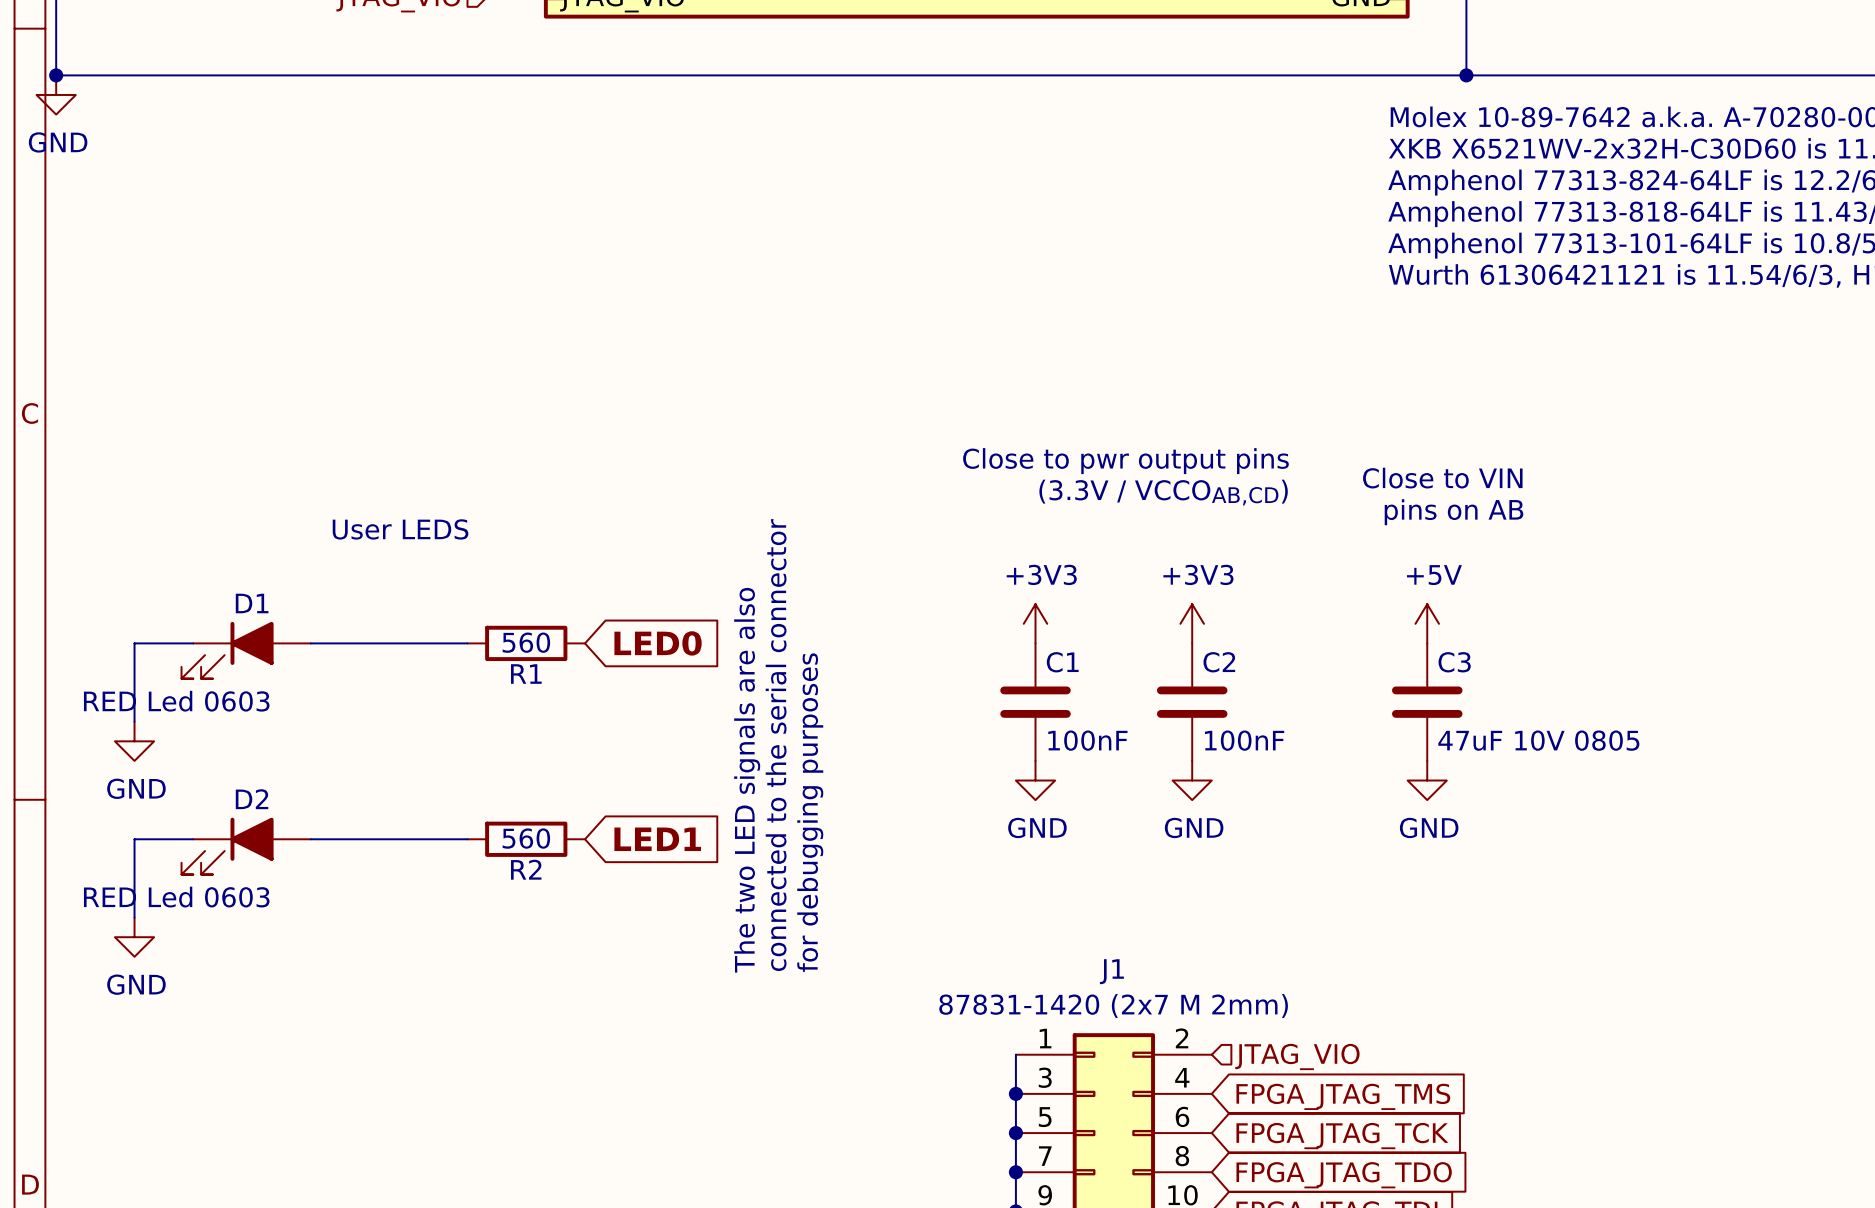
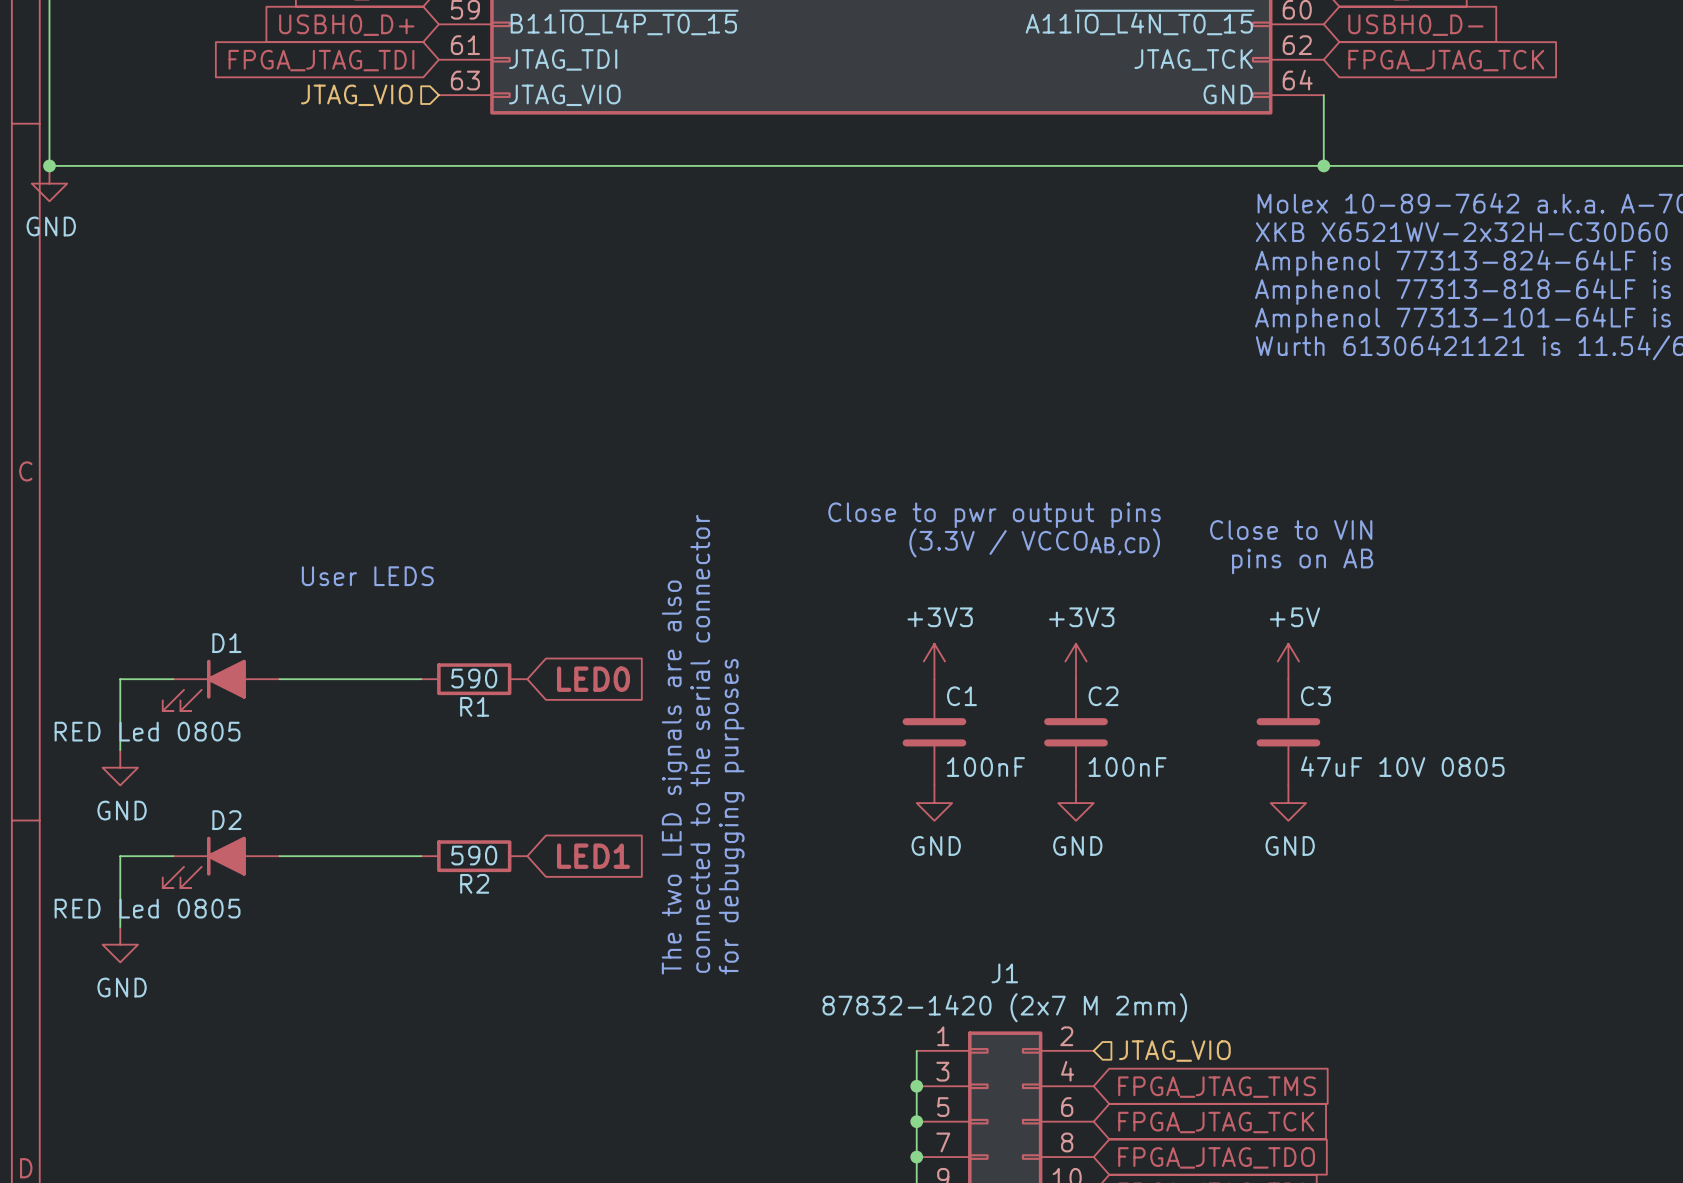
R1 value: 560 (526, 642) -> 590 (474, 678)
D1 value: RED Led 0603 (176, 701) -> RED Led 0805 (147, 731)
R2 value: 560 (526, 838) -> 590 (474, 855)
D2 value: RED Led 0603 (176, 897) -> RED Led 0805 (147, 908)
J1 value: 87831-1420 (2x7 M 2mm) (1113, 1006) -> 87832-1420 (2x7 M 2mm) (1004, 1007)

